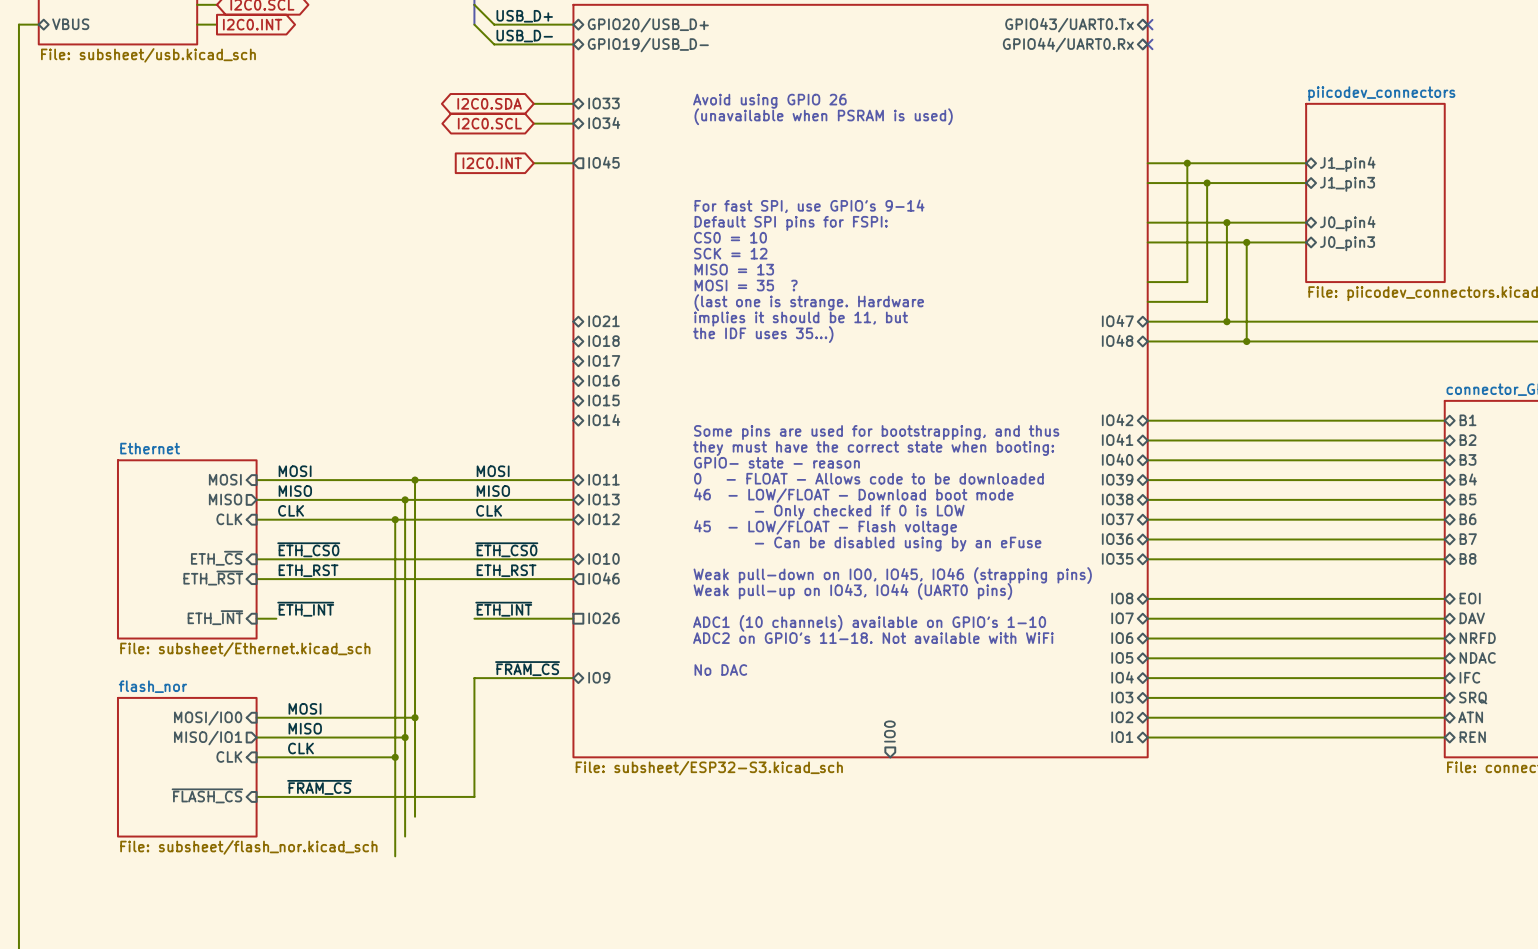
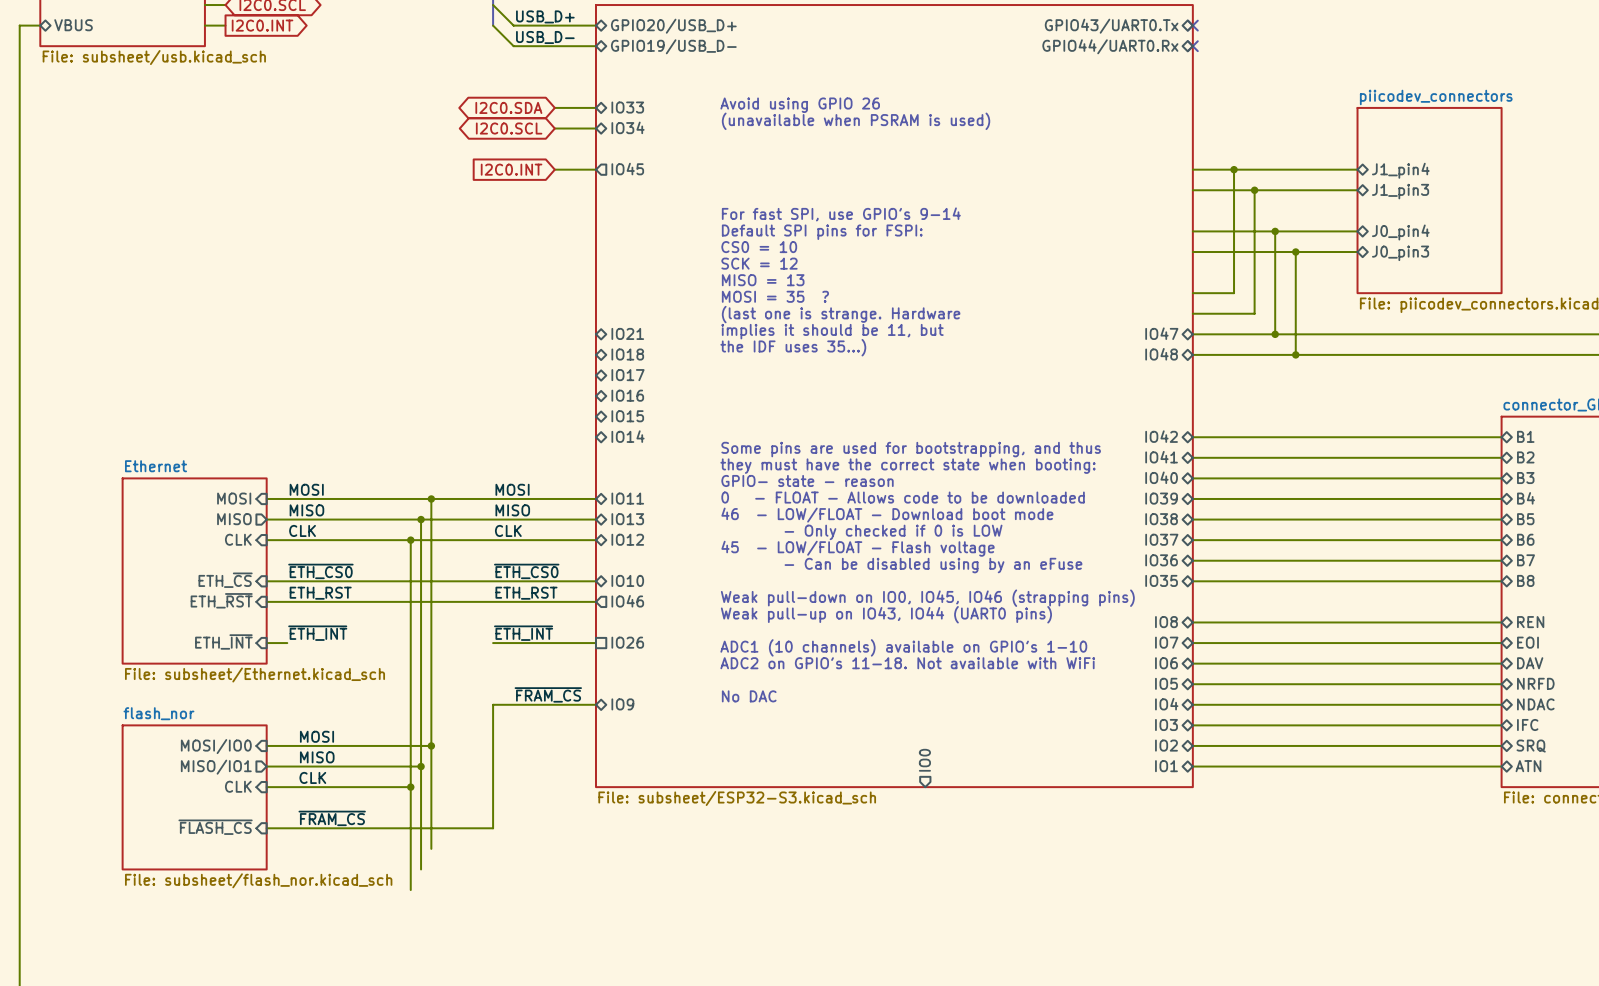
sheet pin: EOI (1470, 598) -> REN (1530, 622)
sheet pin: DAV (1472, 618) -> EOI (1527, 642)
sheet pin: NRFD (1477, 638) -> DAV (1530, 663)
sheet pin: NDAC (1477, 657) -> NRFD (1535, 683)
sheet pin: IFC (1469, 677) -> NDAC (1535, 704)
sheet pin: SRQ (1473, 698) -> IFC (1527, 724)
sheet pin: ATN (1470, 717) -> SRQ (1531, 746)
sheet pin: REN (1472, 737) -> ATN (1528, 766)

